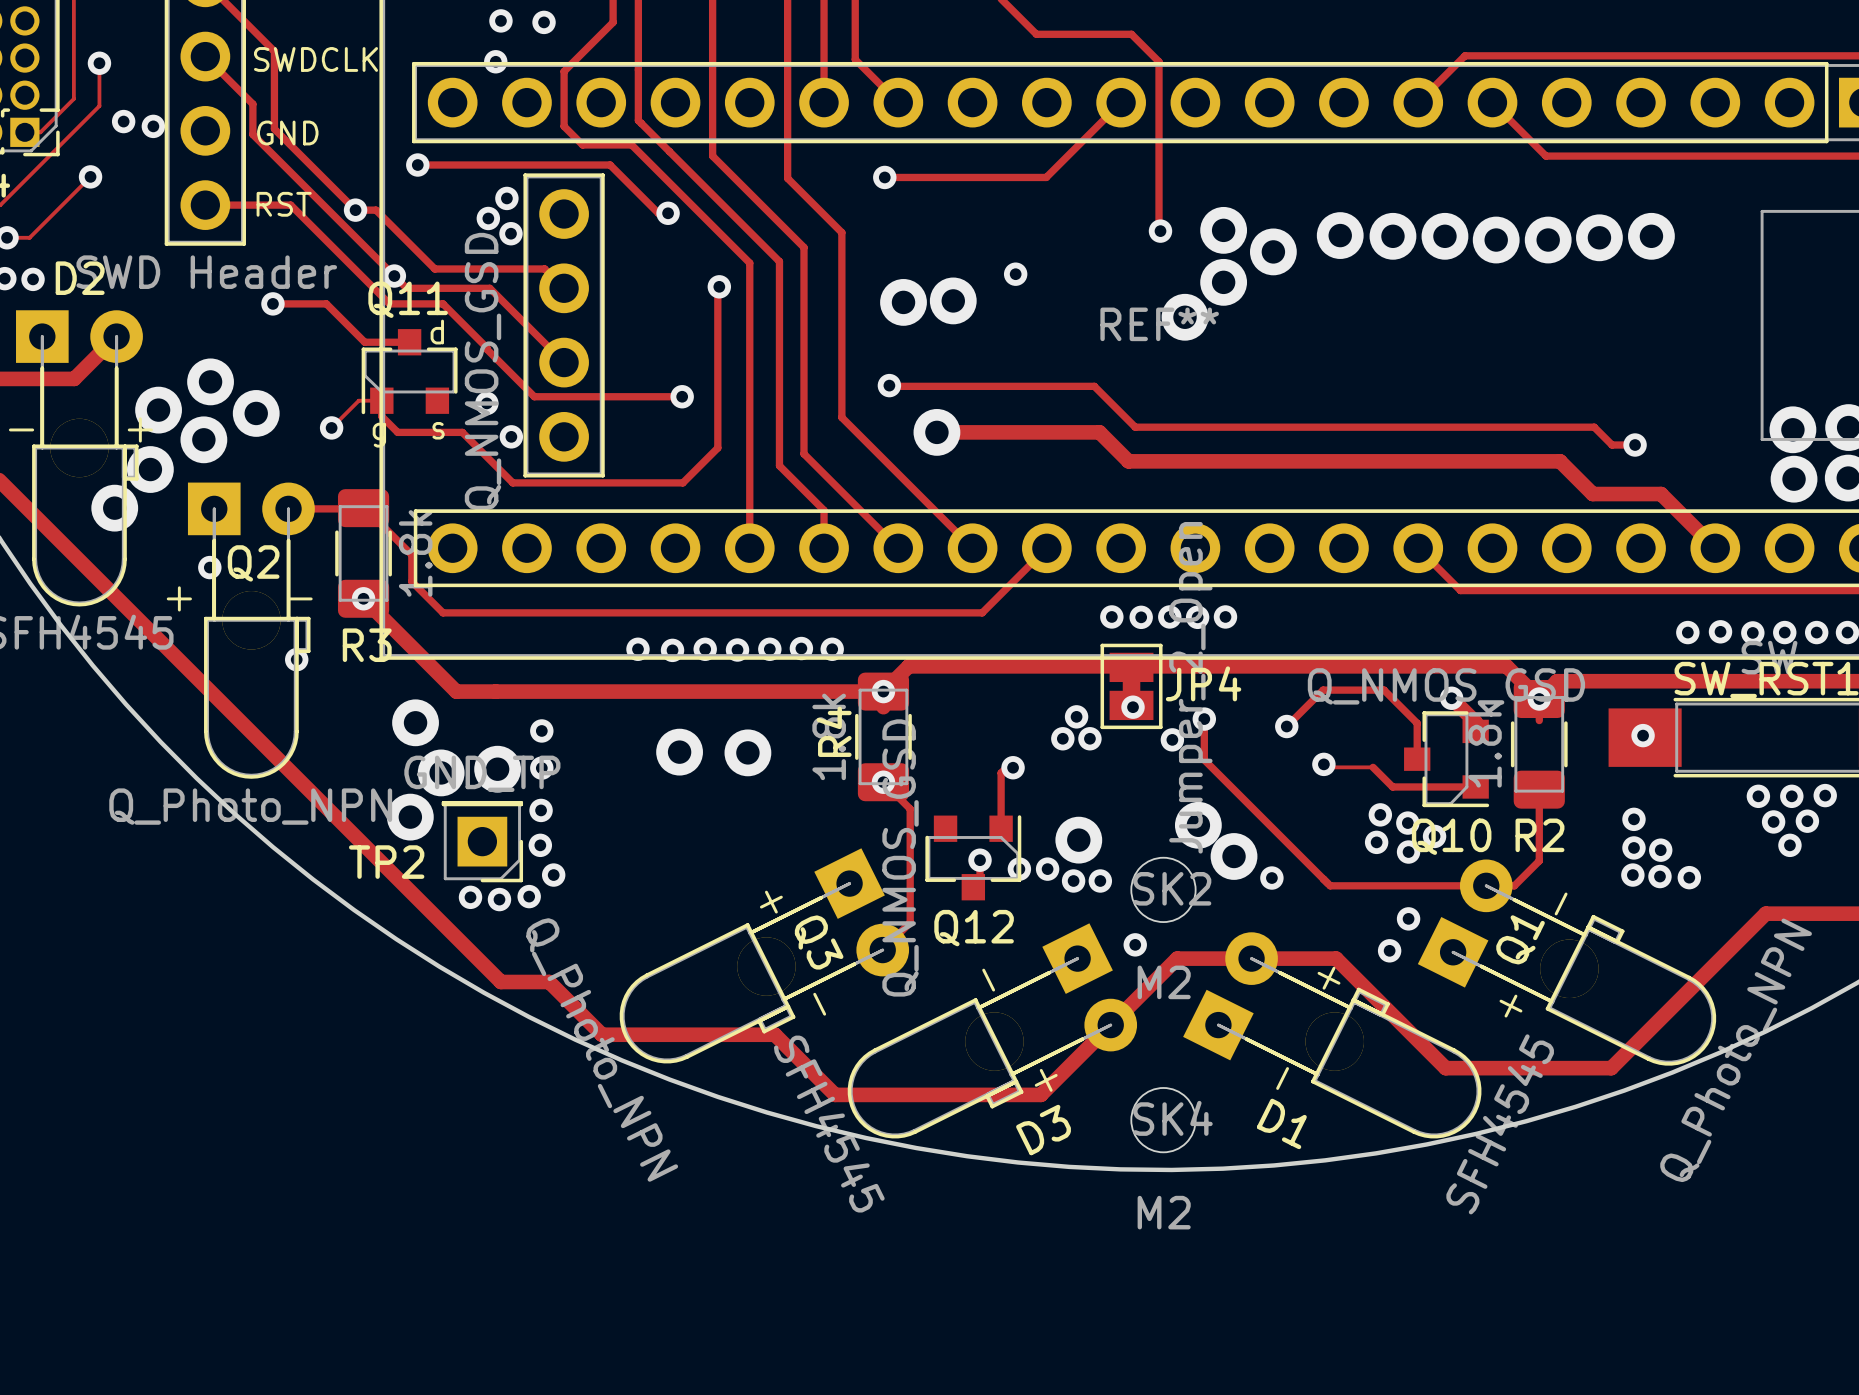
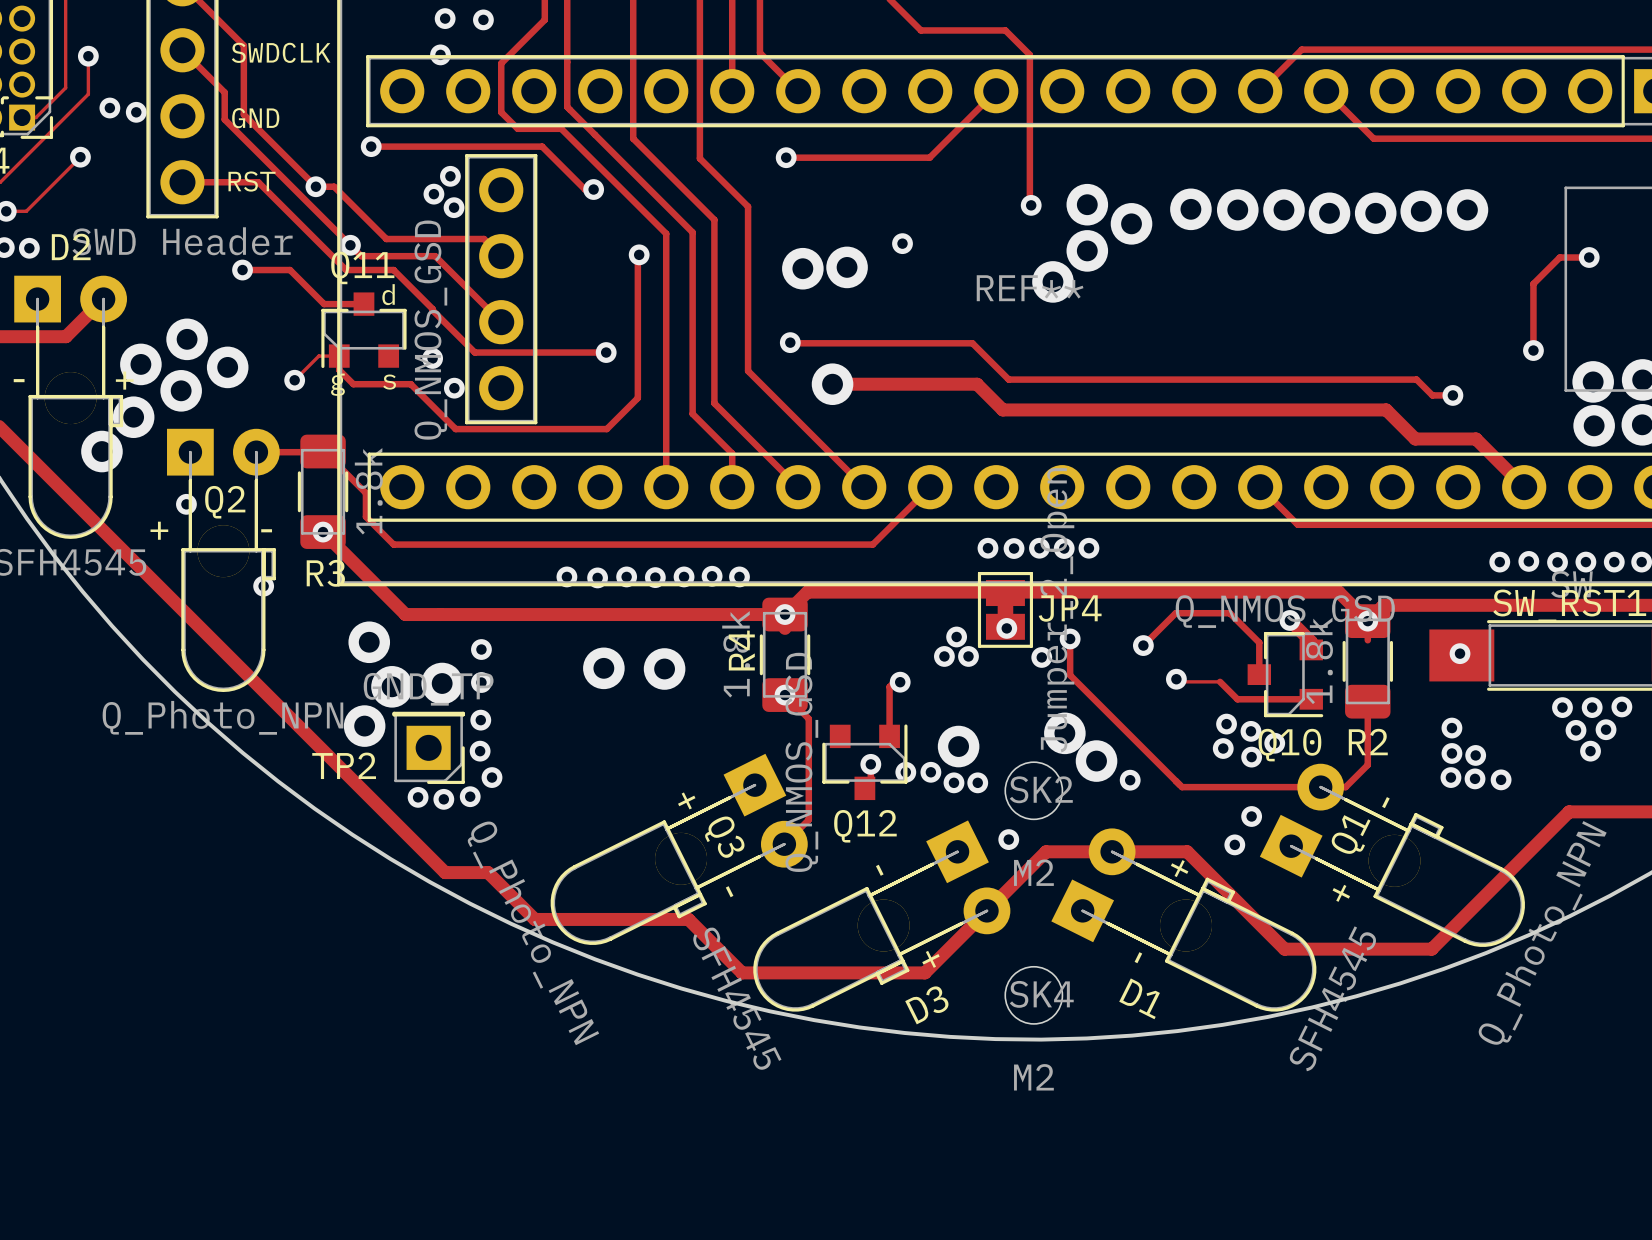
track: none -> (1589, 257) (1559, 257) (1533, 283) (1533, 350)
via: none -> (1589, 257)
via: none -> (1533, 350)

